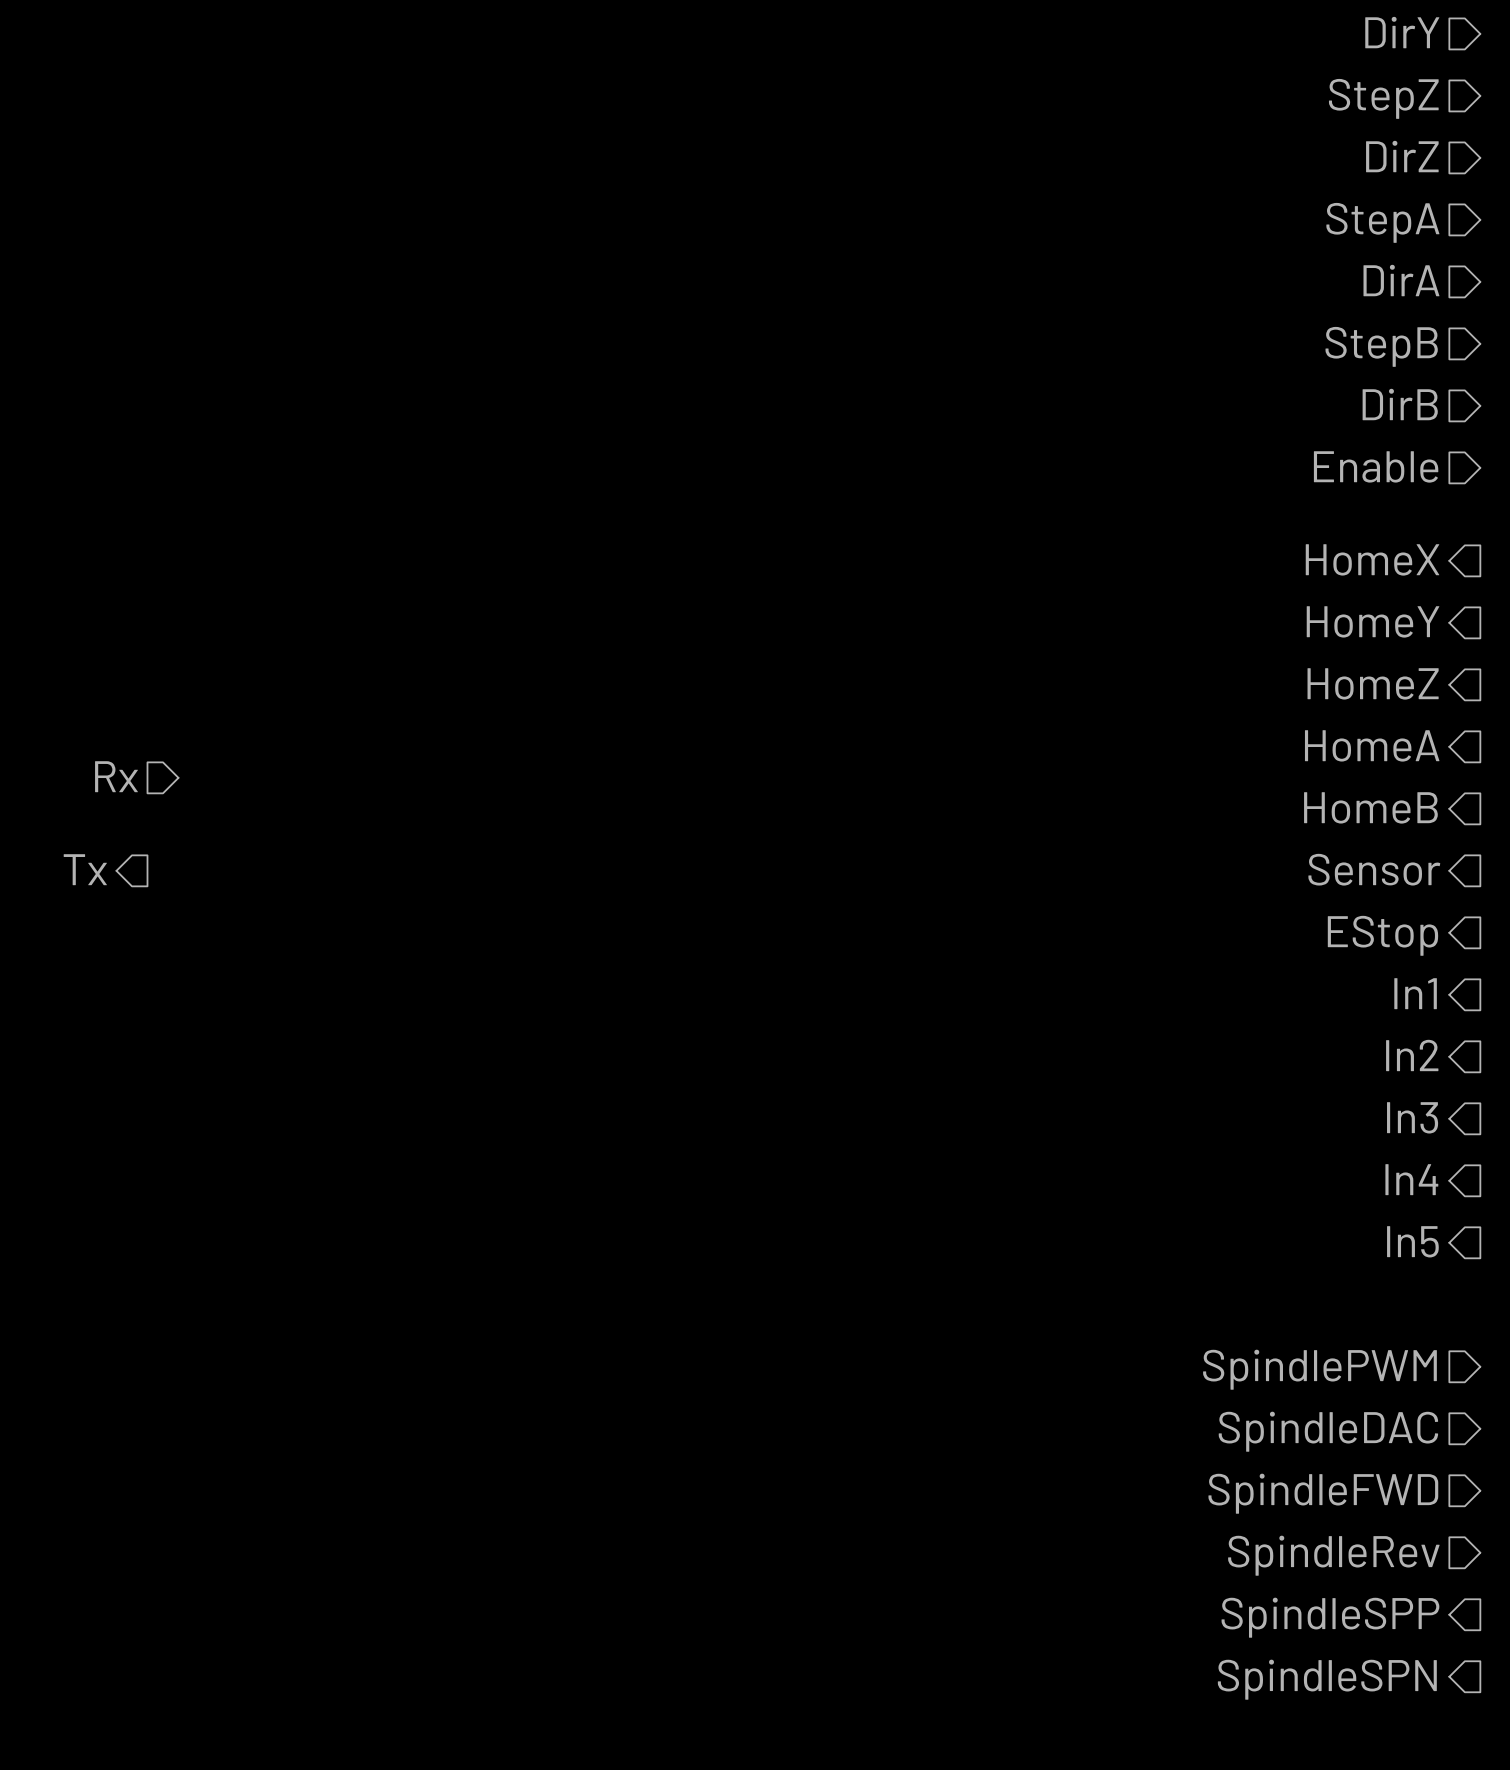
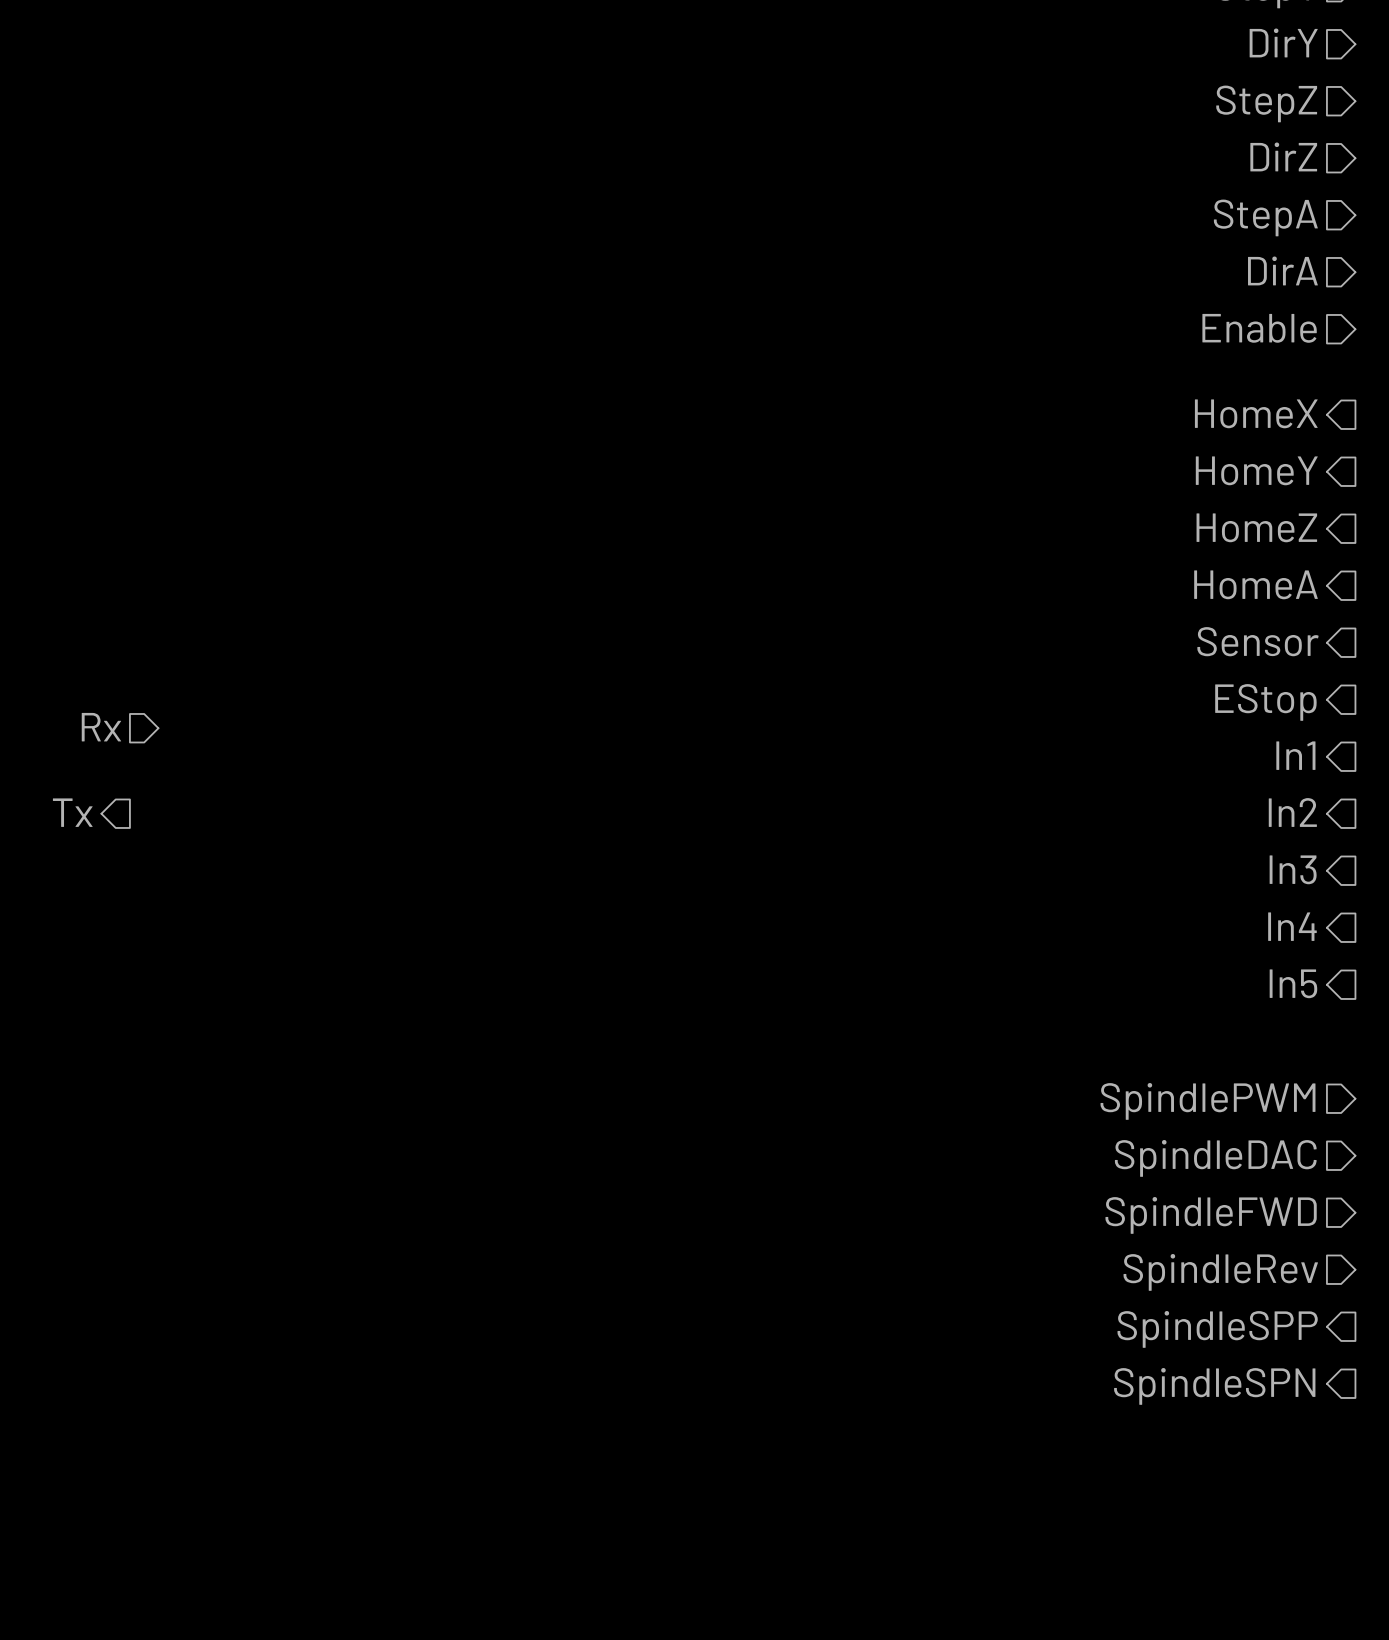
hierarchical label: StepB (1381, 346) -> Enable (1259, 328)
hierarchical label: DirB (1400, 404) -> none
hierarchical label: none -> HomeX (1256, 413)
hierarchical label: Enable (1376, 466) -> none
hierarchical label: none -> HomeY (1256, 470)
hierarchical label: HomeX (1372, 559) -> HomeZ (1256, 527)
hierarchical label: HomeY (1373, 621) -> HomeA (1256, 584)
hierarchical label: HomeZ (1373, 683) -> Sensor (1258, 641)
hierarchical label: HomeA (1372, 745) -> EStop (1265, 702)
hierarchical label: HomeB (1370, 807) -> In1 (1295, 755)
hierarchical label: Sensor (1374, 869) -> In2 (1292, 812)
hierarchical label: EStop (1382, 935) -> In3 (1293, 869)
hierarchical label: In1 (1415, 993) -> In4 (1292, 926)
hierarchical label: In2 (1412, 1055) -> In5 (1293, 983)
hierarchical label: In3 (1412, 1117) -> none
hierarchical label shape: output (1411, 1179) -> input (1208, 1101)
hierarchical label: In4 (1411, 1179) -> SpindlePWM (1208, 1101)
hierarchical label shape: output (1412, 1241) -> input (1215, 1158)
hierarchical label: In5 (1412, 1241) -> SpindleDAC (1215, 1158)
hierarchical label: none -> SpindleFWD (1211, 1215)
hierarchical label: SpindlePWM (1319, 1369) -> SpindleRev (1220, 1272)
hierarchical label shape: input (1328, 1431) -> output (1217, 1329)
hierarchical label: SpindleDAC (1328, 1431) -> SpindleSPP (1217, 1329)
hierarchical label shape: input (1323, 1493) -> output (1214, 1386)
hierarchical label: SpindleFWD (1323, 1493) -> SpindleSPN (1214, 1386)
hierarchical label: SpindleRev (1333, 1555) -> none
hierarchical label: SpindleSPP (1330, 1617) -> none
hierarchical label: SpindleSPN (1327, 1679) -> none

